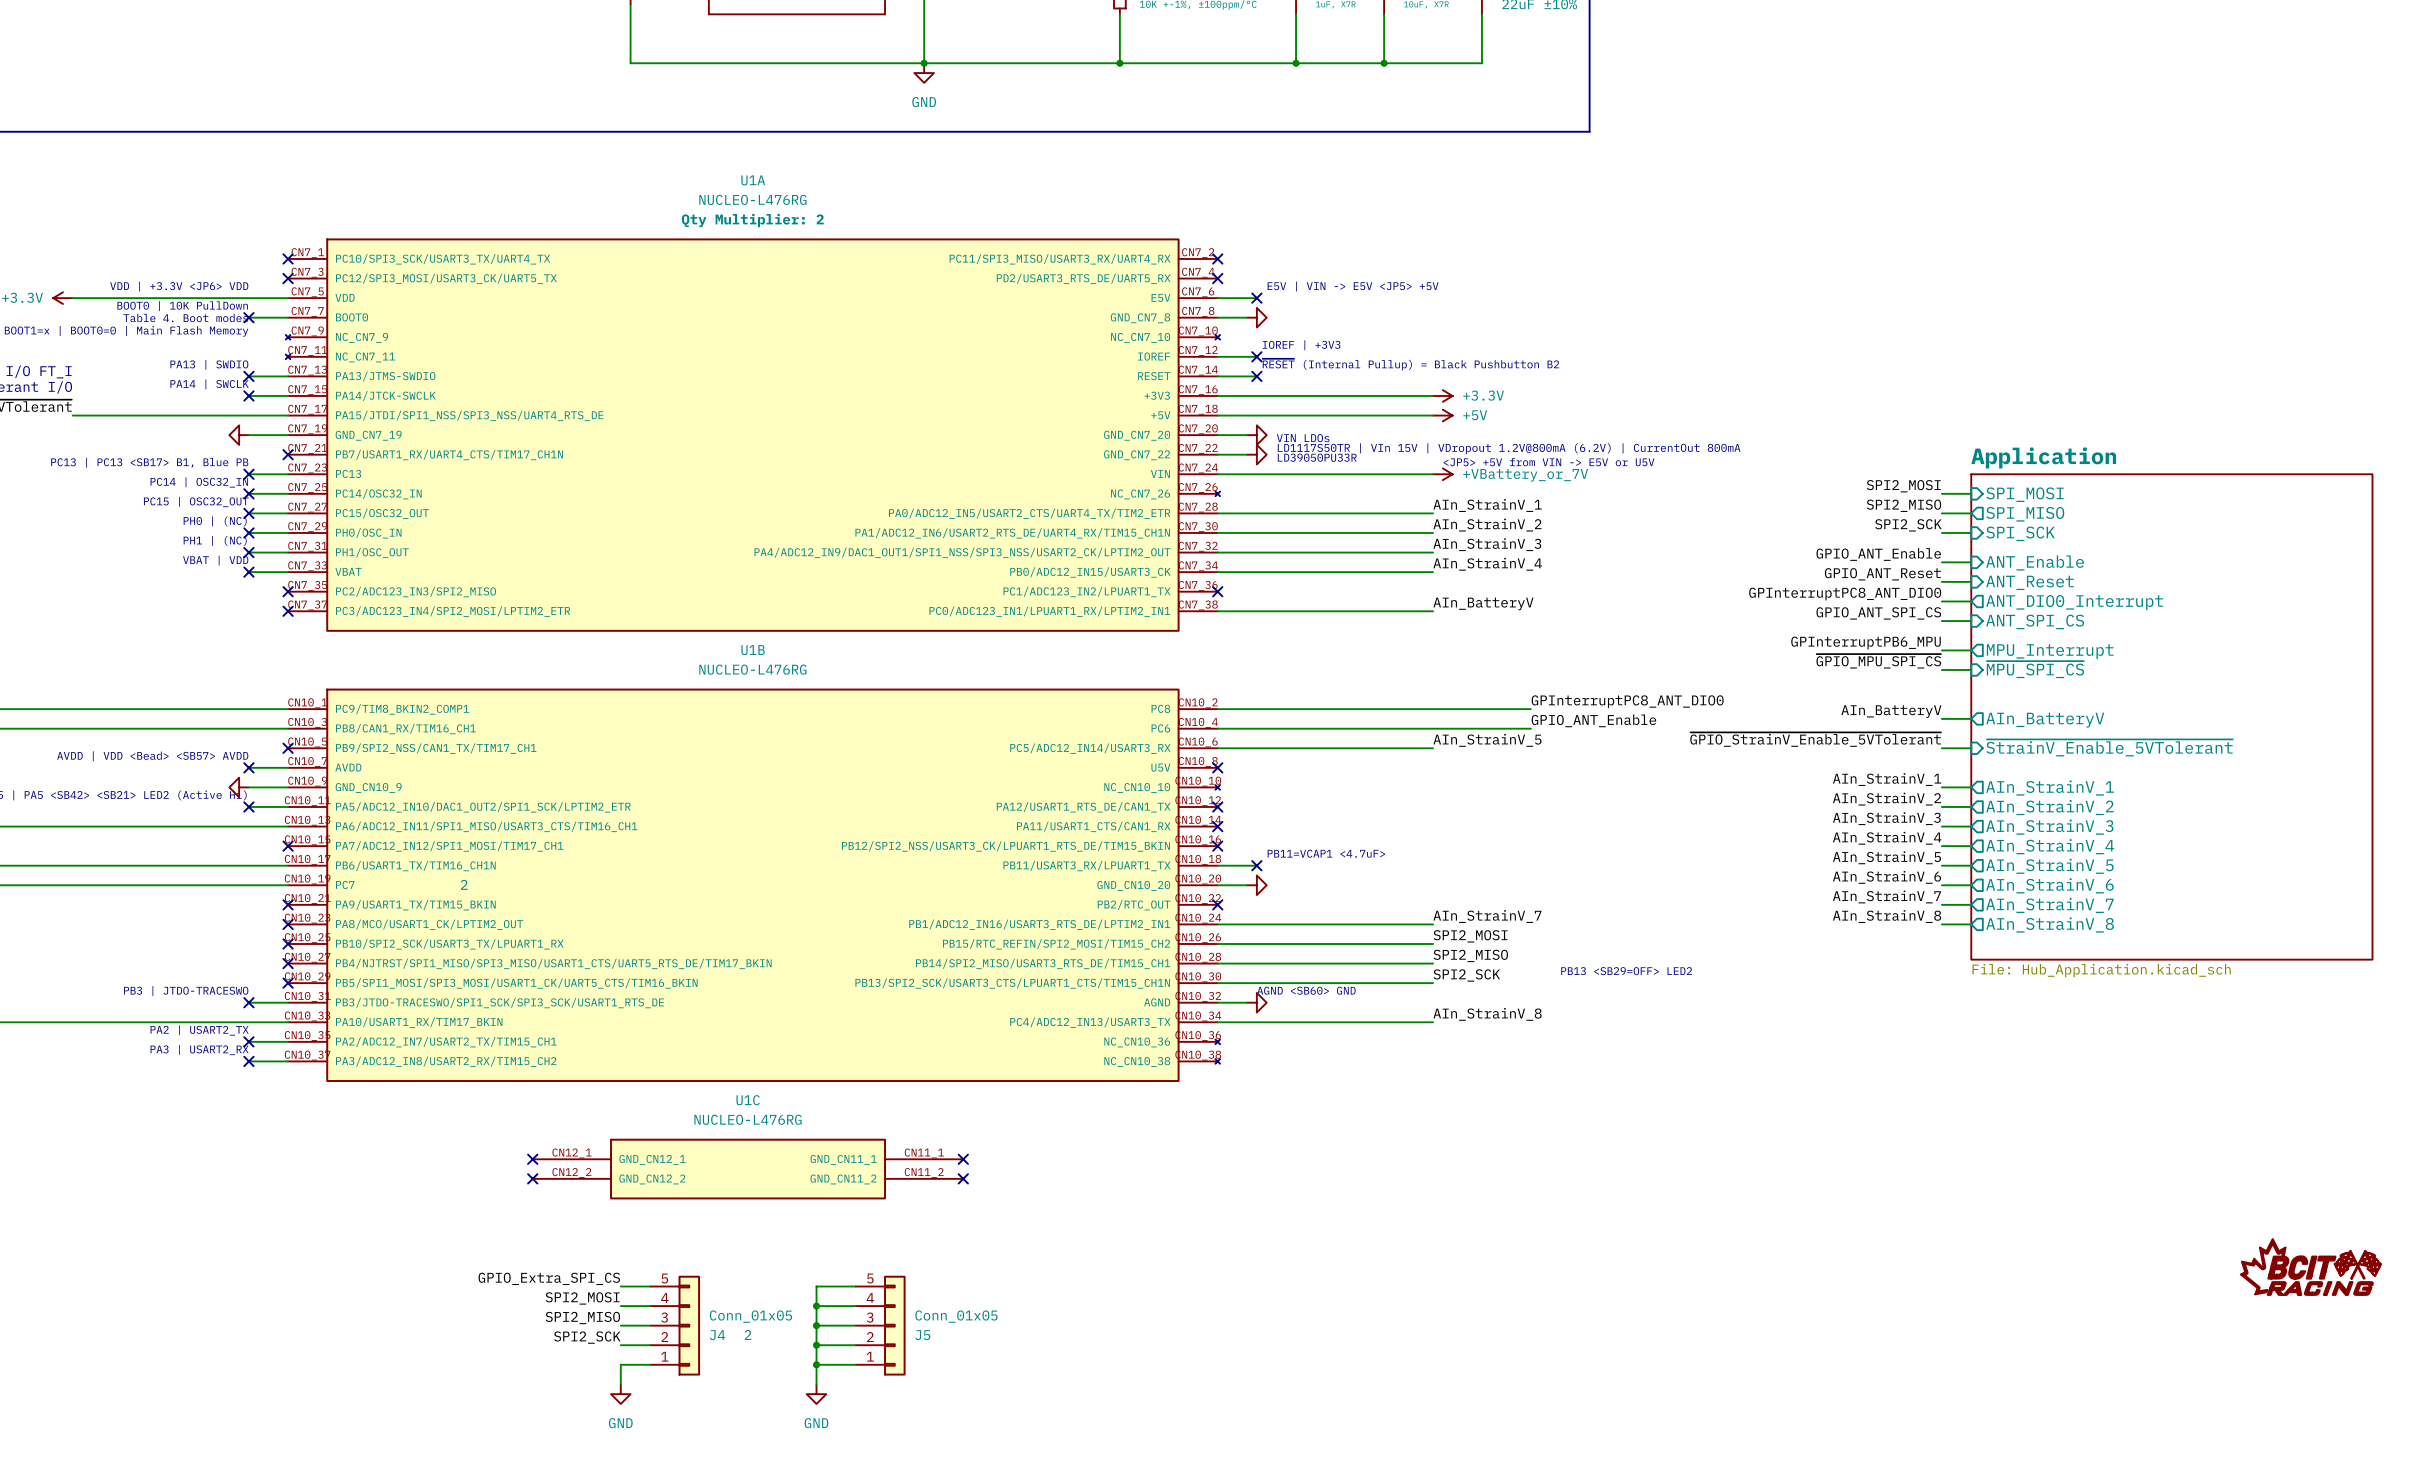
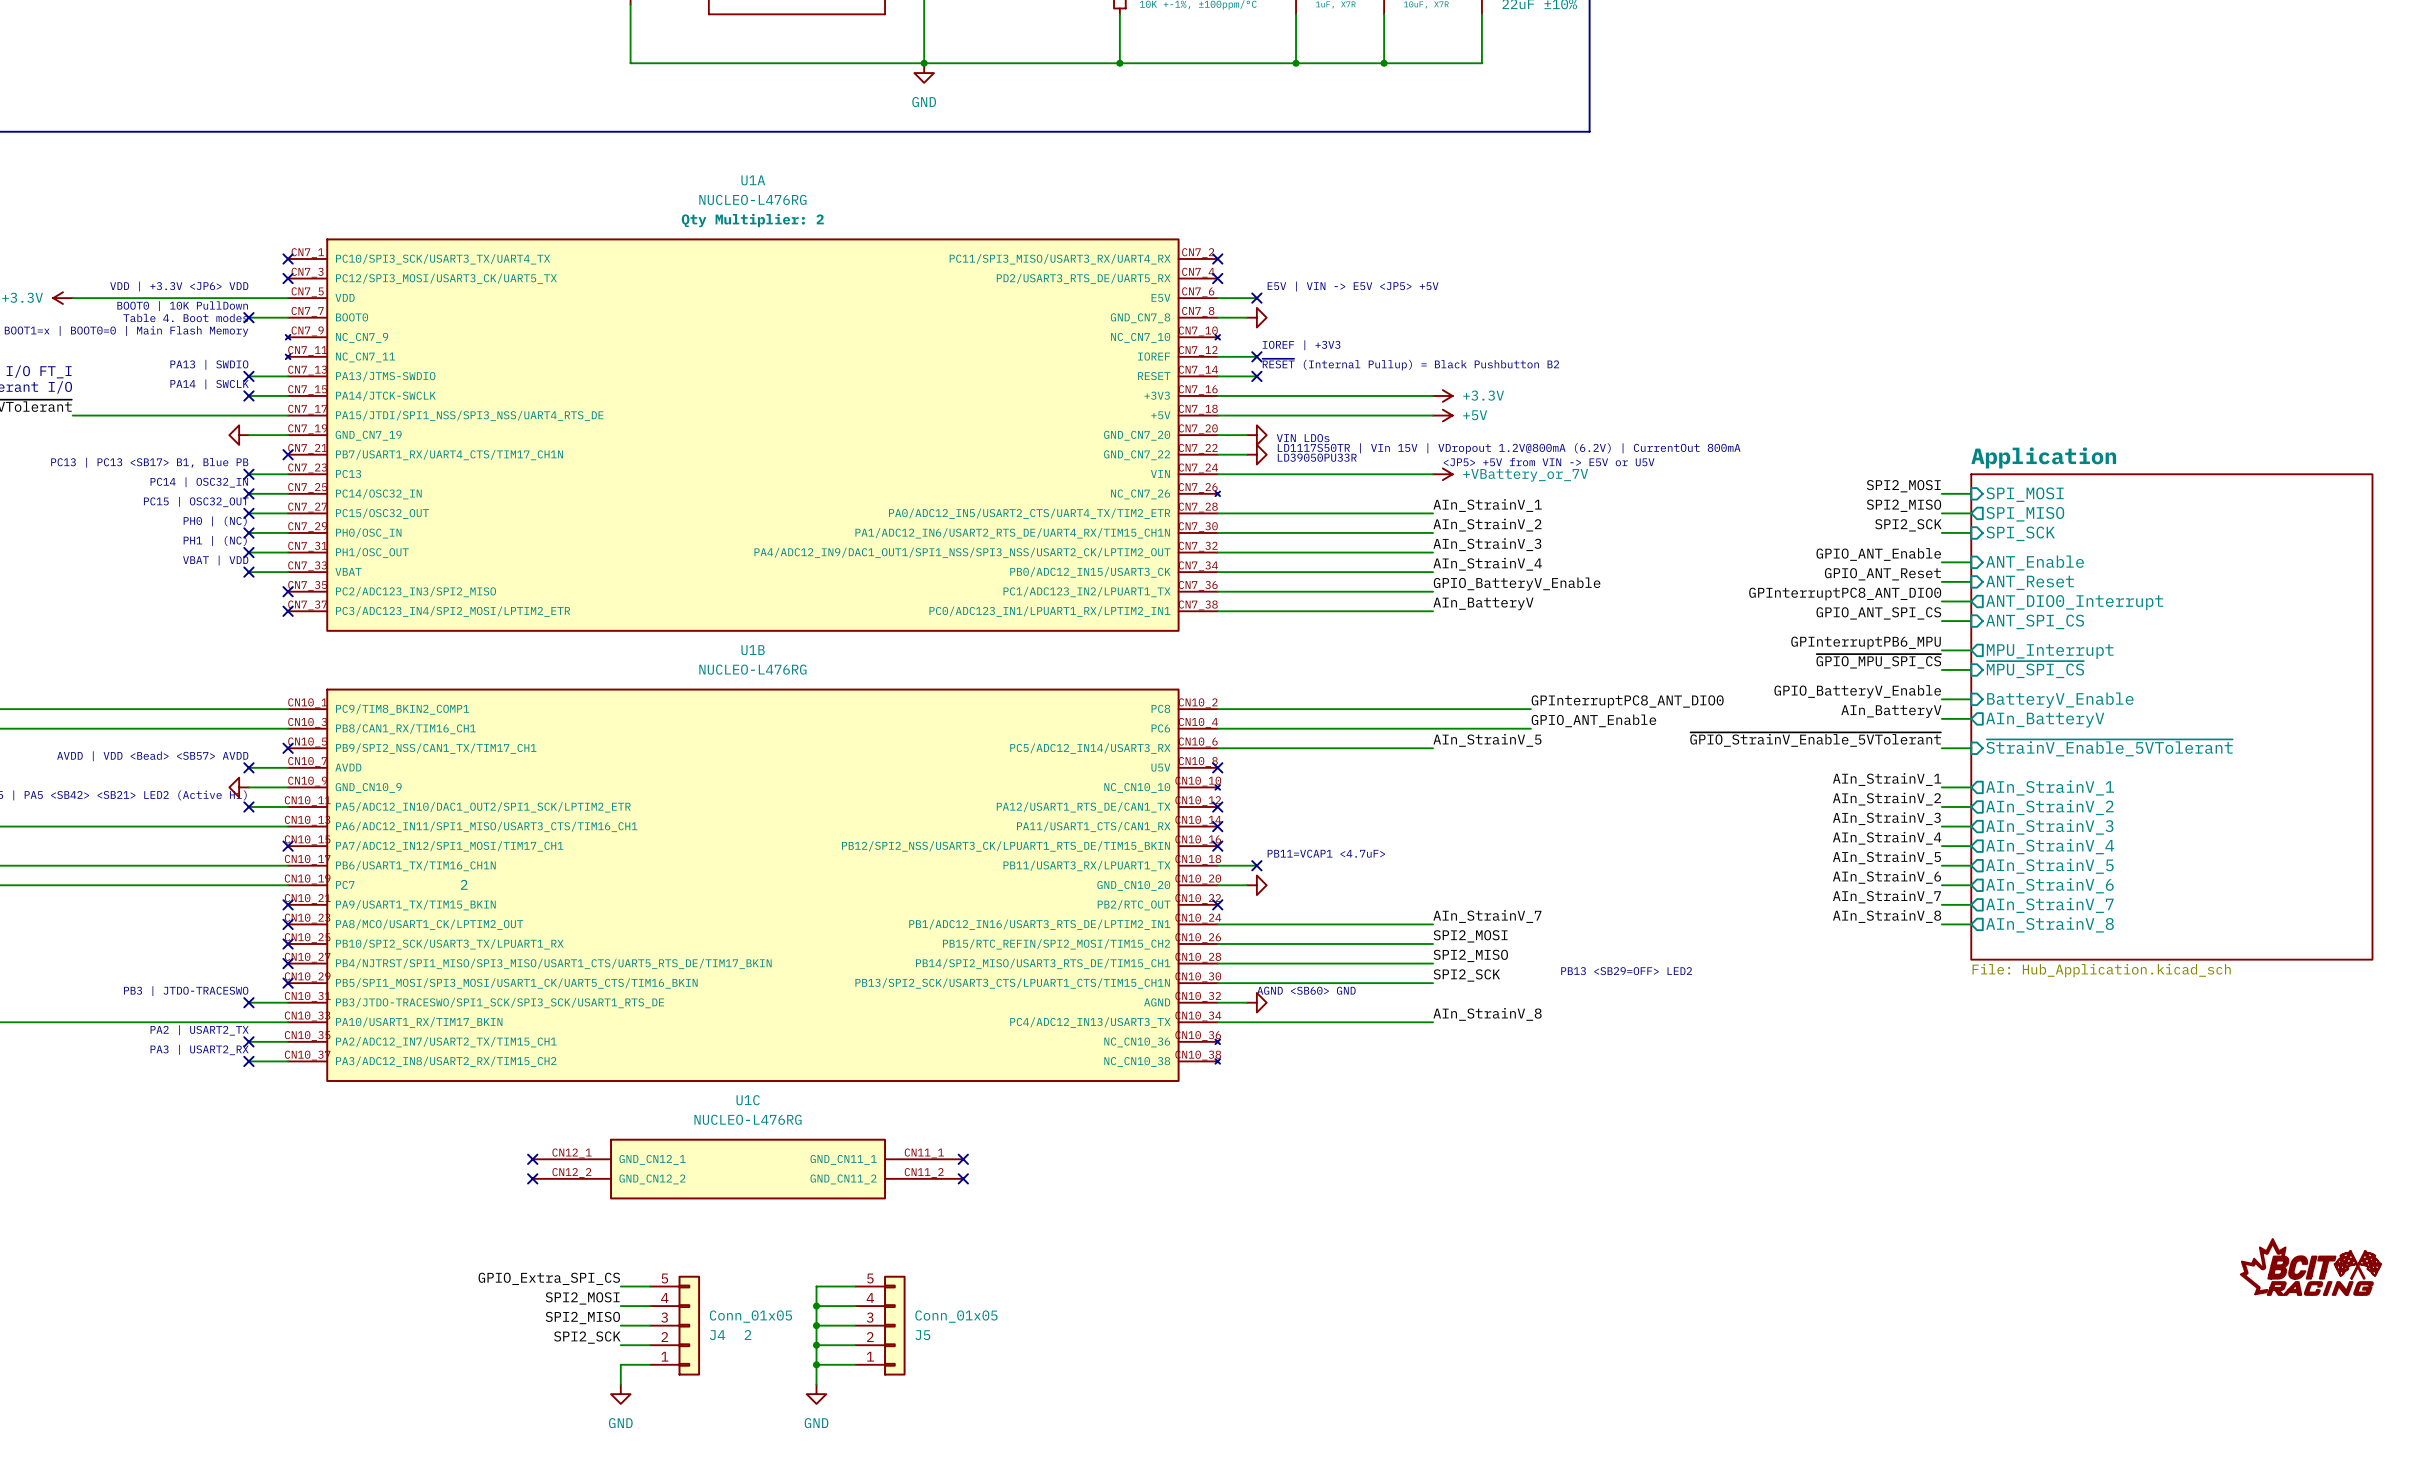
label: none -> GPIO_BatteryV_Enable (1517, 584)
wire: none -> (1217, 591) (1433, 591)
no-connect mark: (1217, 591) -> none
label: none -> GPIO_BatteryV_Enable (1857, 691)
wire: none -> (1941, 699) (1971, 699)
sheet pin: none -> BatteryV_Enable (2060, 700)

